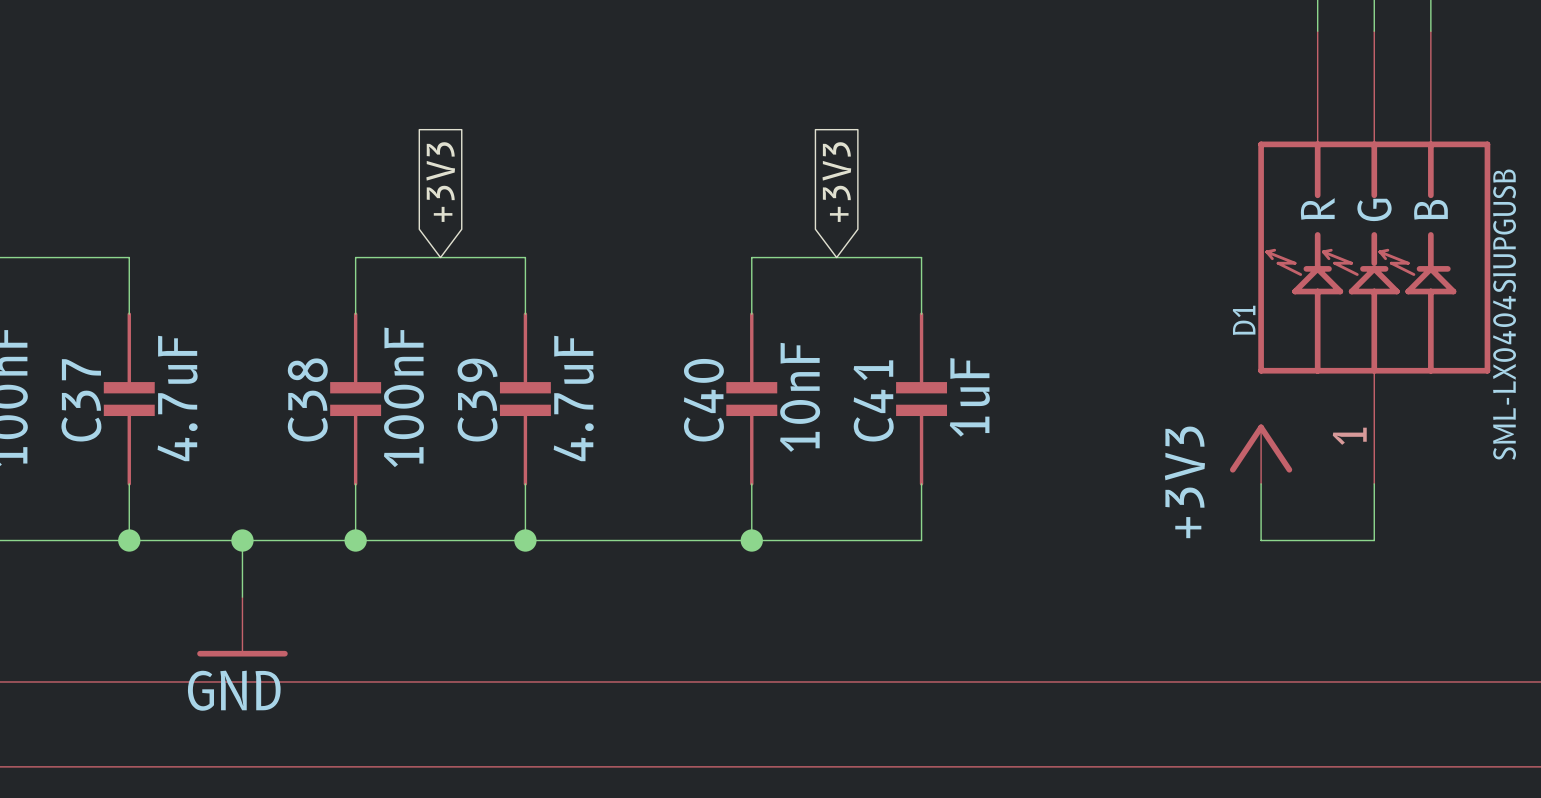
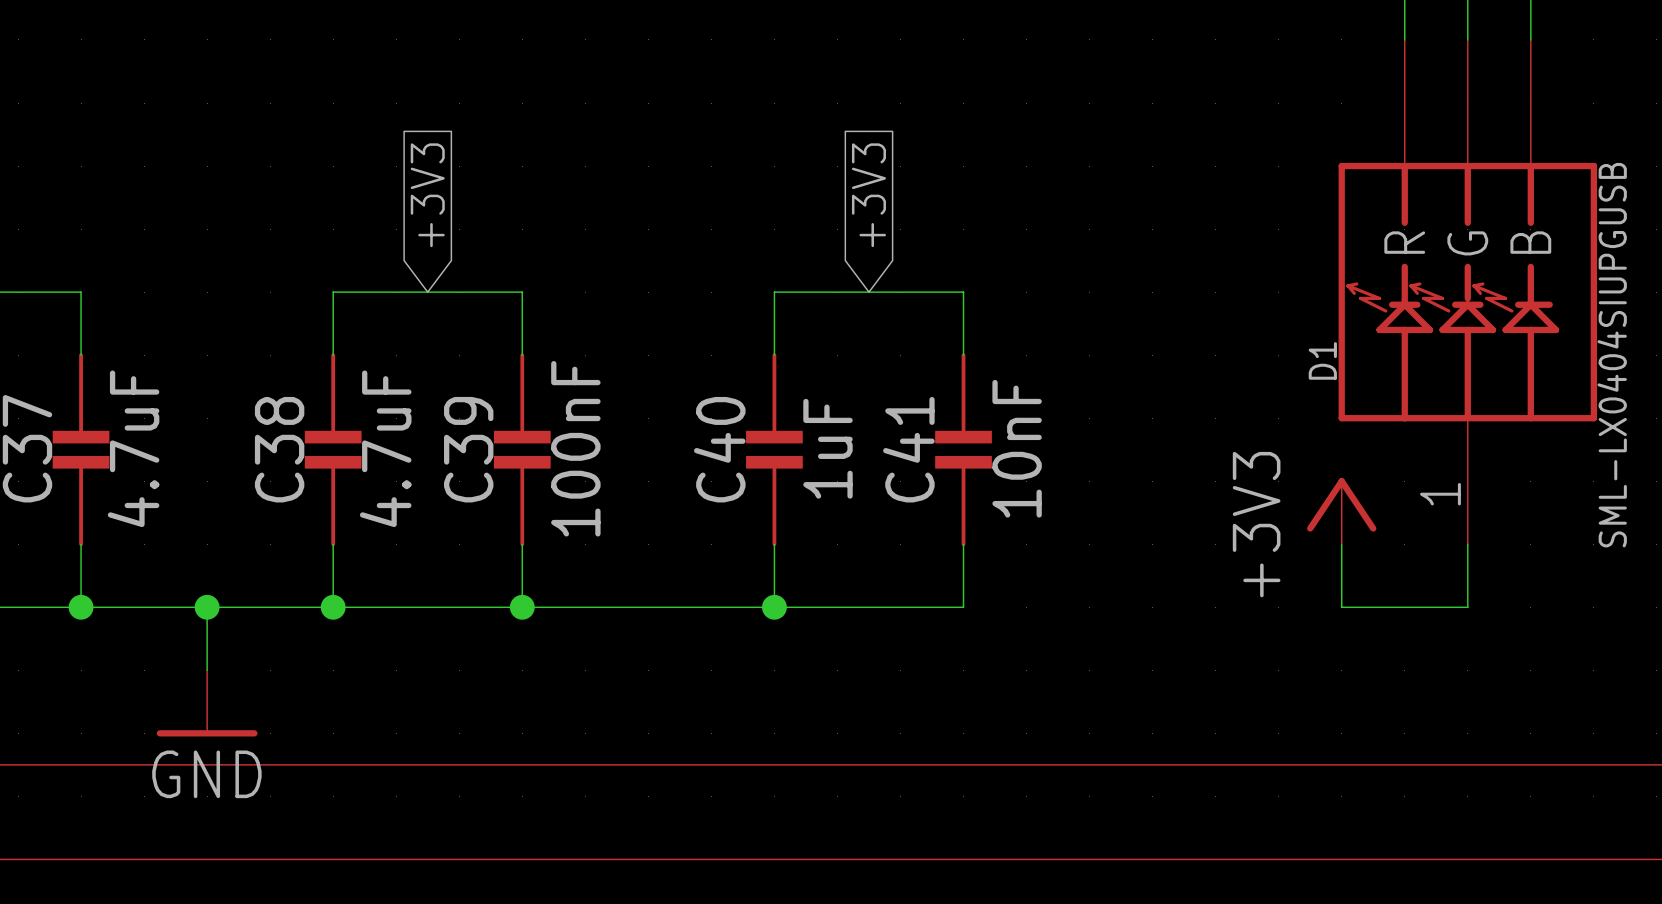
C38 value: 100nF (403, 397) -> 4.7uF (385, 448)
C40 value: 10nF (800, 397) -> 1uF (828, 448)
C41 value: 1uF (969, 397) -> 10nF (1017, 448)
C39 value: 4.7uF (573, 398) -> 100nF (575, 448)

